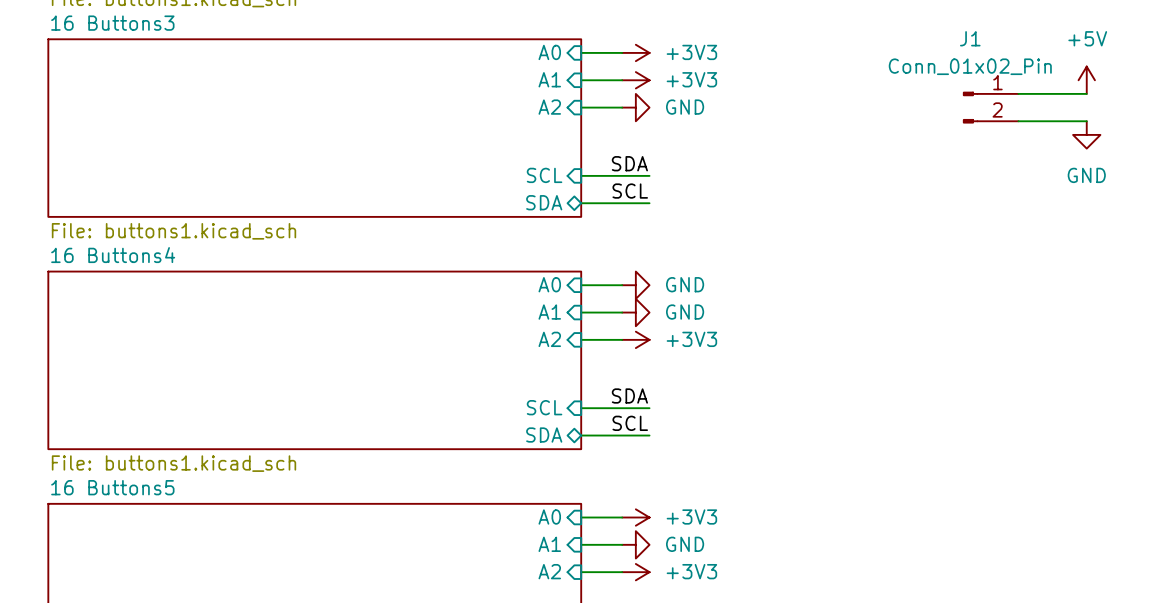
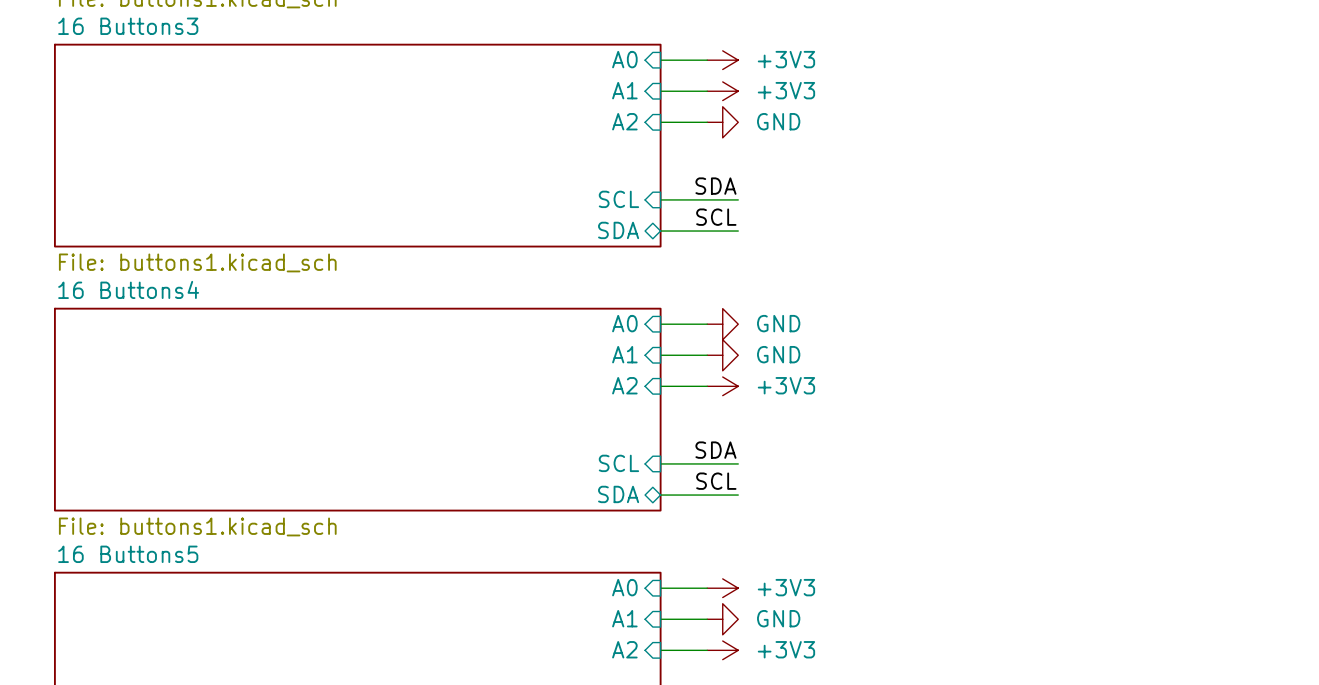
power symbol: +5V (1086, 80) -> none
wire: (1018, 93) (1086, 93) -> none
J1: Conn_01x02_Pin (990, 107) -> none
wire: (1018, 121) (1086, 121) -> none
power symbol: GND (1086, 134) -> none

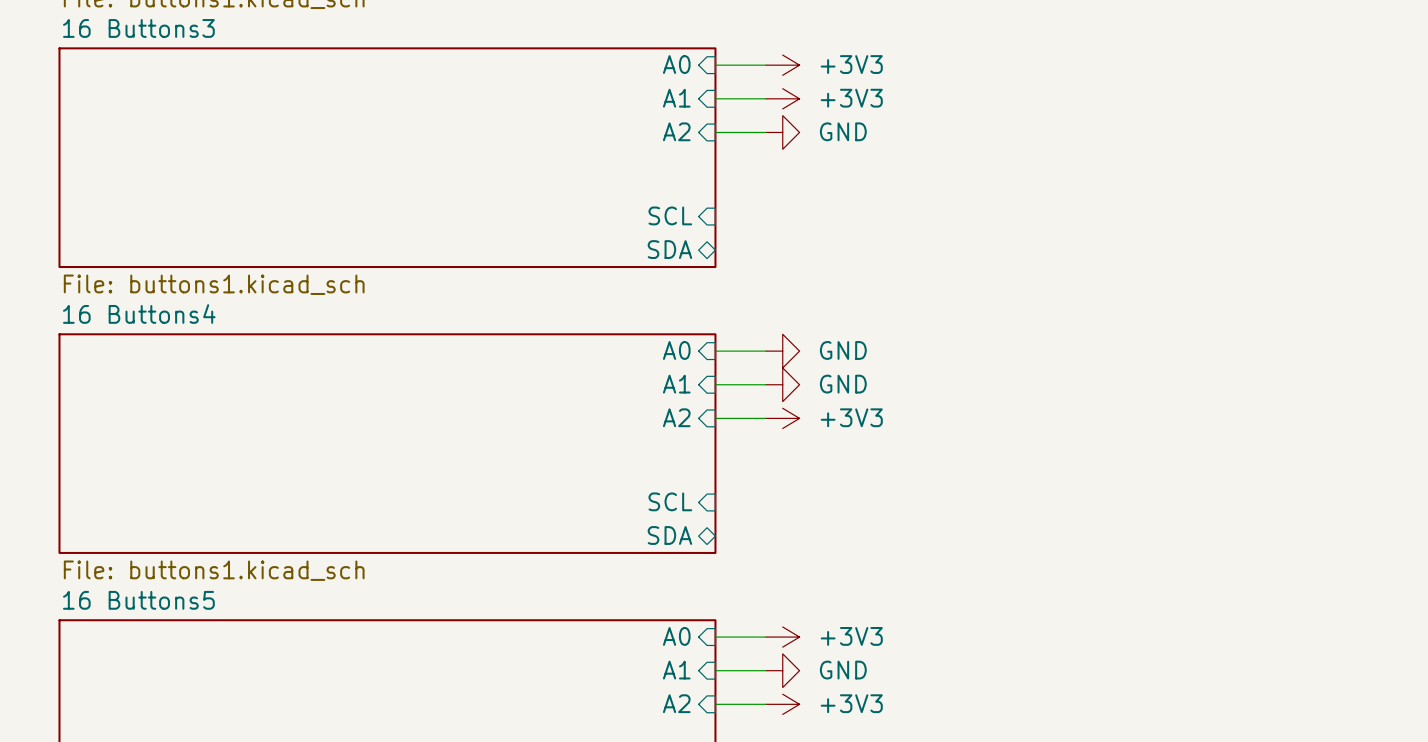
label: SDA (715, 186) -> none
wire: (660, 199) (738, 199) -> none
label: SCL (716, 217) -> none
wire: (660, 231) (738, 231) -> none
label: SDA (715, 450) -> none
wire: (660, 463) (738, 463) -> none
label: SCL (716, 481) -> none
wire: (660, 495) (738, 495) -> none

